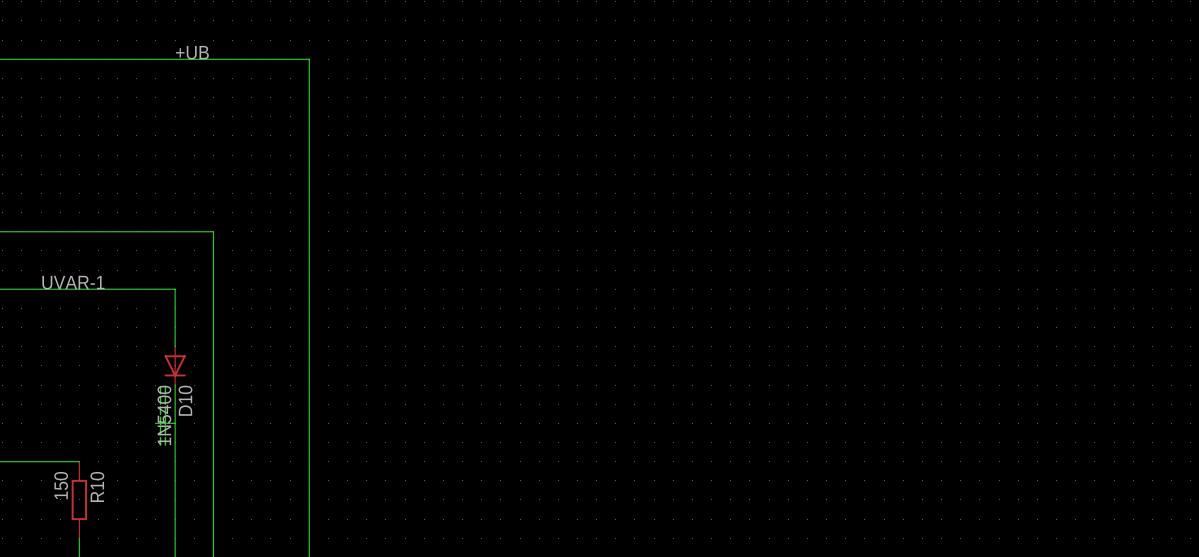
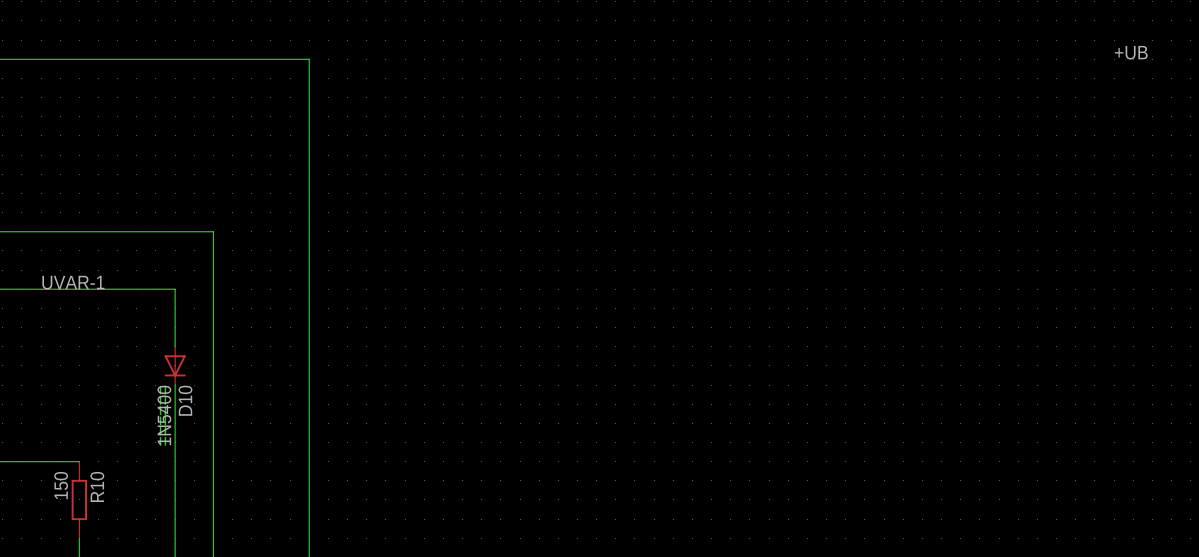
label: +UB (192, 52) -> none
label: none -> +UB (1131, 52)
wire: (155, 423) (175, 423) -> none

